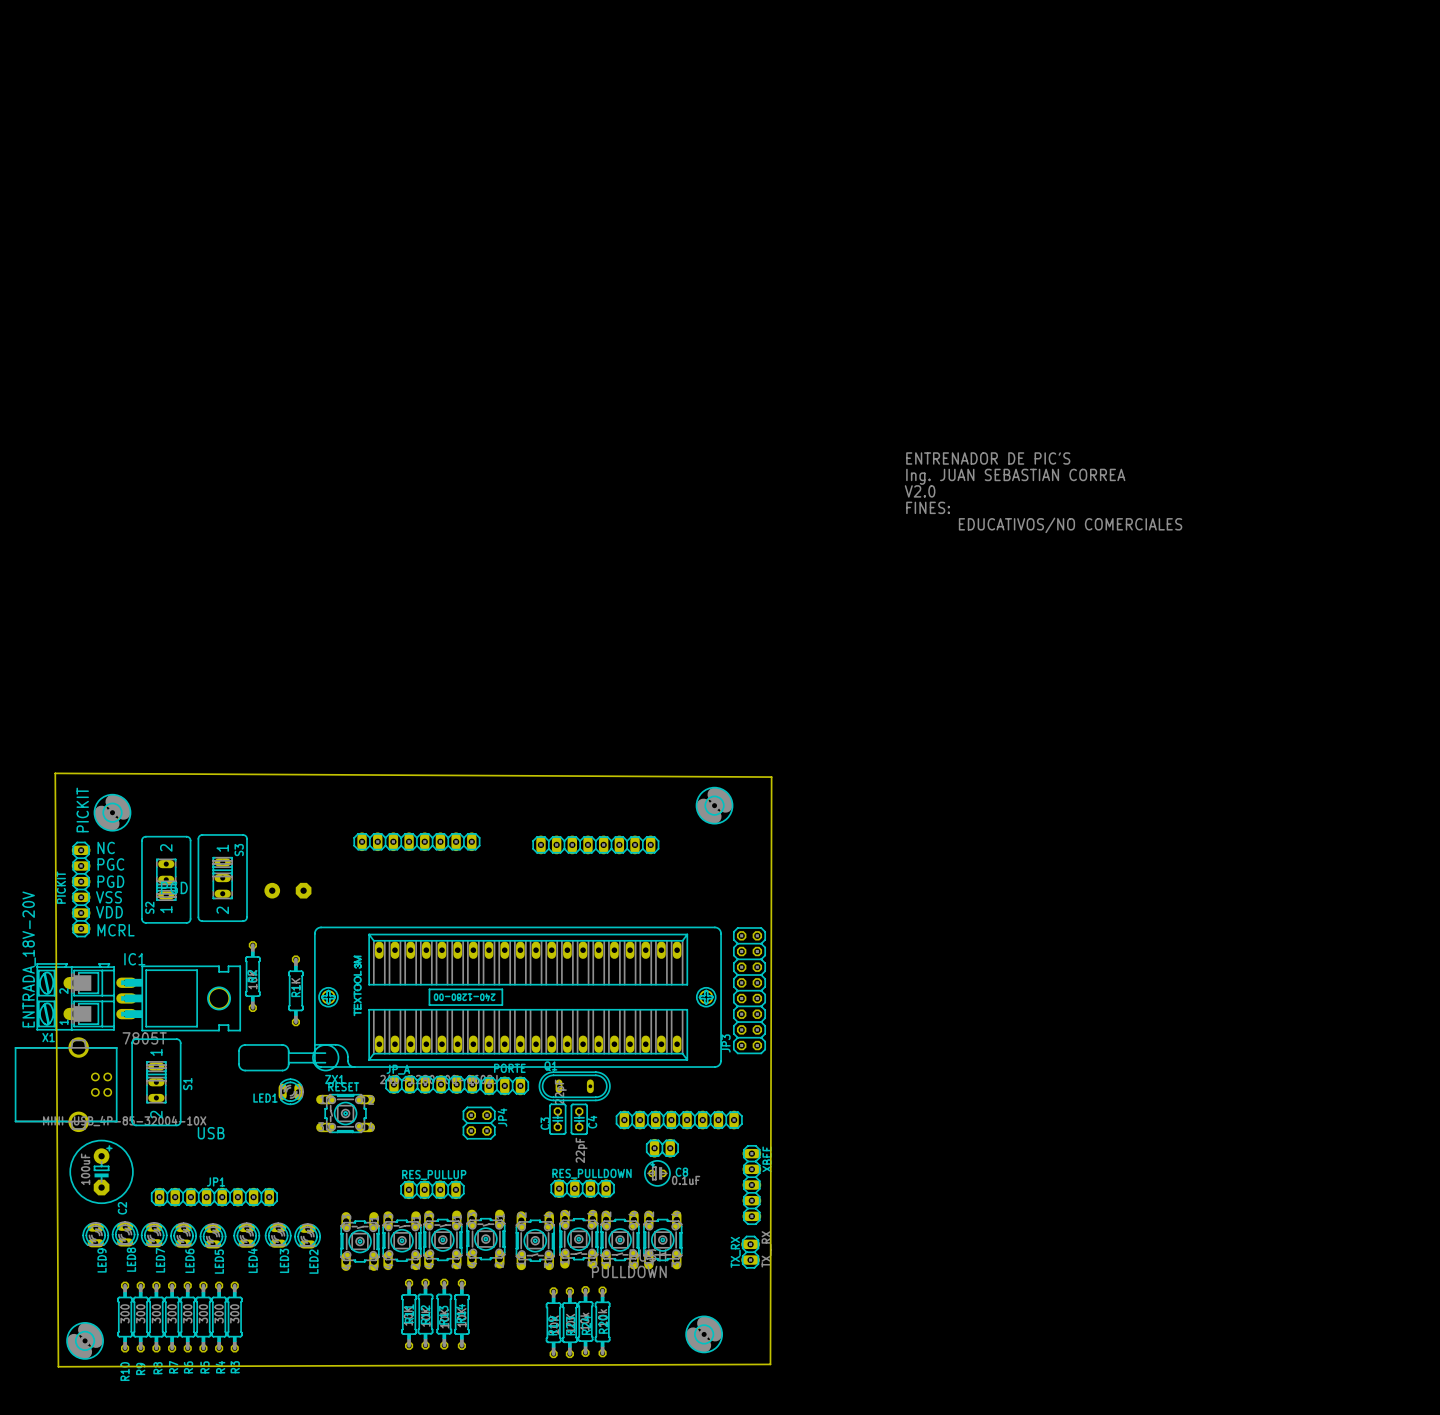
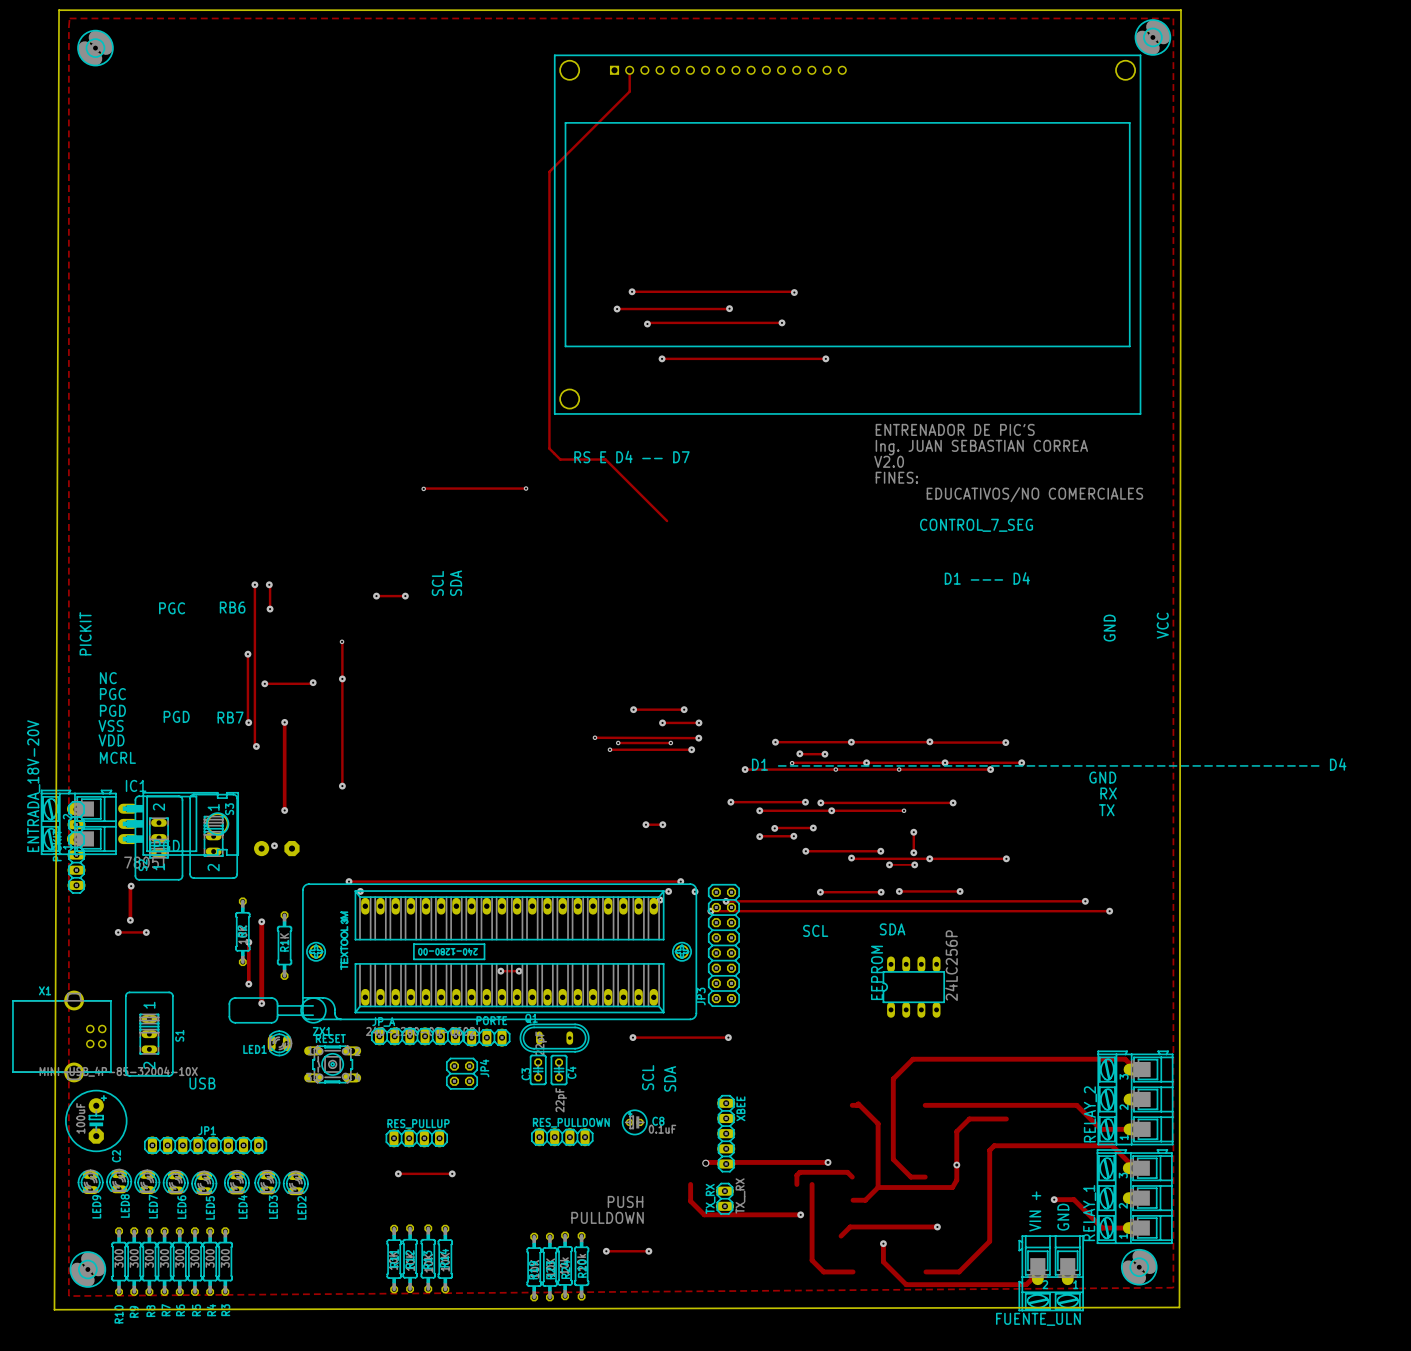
board edge: none -> (59, 10) (1181, 10) (1179, 1307) (54, 1309) (59, 10)
zone outline: none -> (69, 18) (1173, 18) (1173, 1287) (68, 1296) (69, 18)
part: none -> (1152, 37)
part: none -> (95, 48)
track: none -> (629, 70) (629, 91) (549, 171) (549, 448) (560, 459) (605, 459) (667, 521)
part: none -> (847, 234)
track: none -> (632, 291) (794, 292)
via: none -> (632, 291)
via: none -> (794, 292)
via: none -> (617, 309)
track: none -> (729, 308) (617, 309)
via: none -> (729, 308)
track: none -> (782, 322) (647, 324)
via: none -> (782, 322)
via: none -> (647, 324)
track: none -> (662, 358) (825, 358)
via: none -> (662, 358)
via: none -> (825, 358)
text: none -> RS E D4 -- D7 (631, 456)
via: none -> (423, 488)
track: none -> (526, 488) (423, 488)
via: none -> (526, 488)
text: none -> CONTROL_7_SEG (976, 525)
text: none -> D1 --- D4 (987, 578)
text: none -> SCL (437, 583)
text: none -> SDA (456, 583)
track: none -> (254, 584) (254, 744) (256, 746)
via: none -> (254, 584)
track: none -> (269, 584) (270, 609)
via: none -> (269, 584)
track: none -> (376, 596) (405, 596)
via: none -> (376, 596)
via: none -> (405, 596)
text: none -> RB6 (232, 607)
text: none -> PGC (172, 608)
via: none -> (270, 609)
text: none -> VCC (1162, 625)
text: none -> GND (1109, 628)
track: none -> (342, 641) (342, 786)
via: none -> (342, 641)
track: none -> (247, 654) (248, 722)
via: none -> (247, 654)
via: none -> (342, 678)
track: none -> (313, 682) (264, 683)
via: none -> (313, 682)
via: none -> (264, 683)
text: none -> PGC (112, 694)
track: none -> (633, 709) (684, 709)
via: none -> (633, 709)
via: none -> (684, 709)
text: none -> PGD (112, 710)
text: none -> PGD (176, 716)
text: none -> RB7 (230, 717)
via: none -> (248, 722)
track: none -> (284, 722) (284, 810)
via: none -> (284, 722)
track: none -> (662, 722) (698, 722)
via: none -> (662, 722)
via: none -> (698, 722)
board edge: (55, 773) (771, 777) (770, 1364) (58, 1366) (55, 773) -> none
track: none -> (594, 737) (698, 738)
via: none -> (594, 737)
via: none -> (698, 738)
via: none -> (775, 742)
via: none -> (851, 742)
track: none -> (929, 741) (1005, 742)
track: none -> (929, 741) (775, 742)
via: none -> (929, 741)
track: none -> (618, 743) (670, 743)
via: none -> (618, 743)
via: none -> (670, 743)
via: none -> (1005, 742)
via: none -> (256, 746)
track: none -> (609, 749) (691, 749)
via: none -> (609, 749)
via: none -> (691, 749)
track: none -> (799, 753) (824, 754)
via: none -> (799, 753)
via: none -> (824, 754)
via: none -> (792, 763)
via: none -> (866, 762)
via: none -> (945, 762)
track: none -> (1021, 762) (792, 763)
via: none -> (1021, 762)
text: none -> D1 ---------------------------------------------- D4 (1049, 764)
part: (714, 805) -> none
text position: PICKIT (82, 809) -> PICKIT (85, 633)
track: none -> (745, 769) (990, 769)
via: none -> (745, 769)
via: none -> (835, 769)
via: none -> (899, 769)
via: none -> (990, 769)
part: (112, 812) -> none
text: none -> GND (1102, 777)
via: none -> (342, 786)
text: none -> RX (1108, 793)
part: (416, 841) -> none
track: none -> (730, 802) (805, 802)
via: none -> (730, 802)
via: none -> (805, 802)
track: none -> (820, 802) (953, 802)
via: none -> (820, 802)
via: none -> (953, 802)
part: (595, 844) -> none
text position: NC (106, 847) -> NC (108, 678)
via: none -> (284, 810)
track: none -> (759, 810) (904, 810)
via: none -> (759, 810)
via: none -> (831, 810)
via: none -> (904, 810)
text: none -> TX (1106, 810)
text: PGC (110, 864) -> none
track: none -> (645, 824) (662, 824)
via: none -> (645, 824)
via: none -> (662, 824)
via: none -> (774, 828)
track: none -> (813, 828) (774, 828)
via: none -> (813, 828)
track: none -> (913, 832) (913, 852)
via: none -> (913, 832)
track: none -> (793, 836) (759, 836)
via: none -> (793, 836)
via: none -> (759, 836)
text: PGD (110, 881) -> none
via: none -> (274, 845)
track: none -> (805, 851) (880, 851)
via: none -> (805, 851)
via: none -> (880, 851)
via: none -> (913, 852)
text position: VSS (108, 897) -> VSS (111, 725)
track: none -> (851, 857) (852, 858) (1006, 858)
via: none -> (851, 858)
via: none -> (929, 858)
via: none -> (1006, 858)
track: none -> (889, 864) (915, 864)
via: none -> (889, 864)
via: none -> (914, 864)
text position: VDD (109, 912) -> VDD (111, 740)
track: none -> (349, 881) (680, 881)
via: none -> (349, 881)
via: none -> (680, 881)
track: none -> (131, 886) (130, 920)
via: none -> (131, 886)
text position: MCRL (116, 930) -> MCRL (117, 757)
via: none -> (360, 891)
via: none -> (668, 891)
track: none -> (899, 891) (960, 891)
via: none -> (899, 891)
via: none -> (960, 891)
via: none -> (695, 891)
track: none -> (820, 892) (881, 892)
via: none -> (820, 892)
via: none -> (881, 892)
via: none -> (660, 900)
track: none -> (726, 901) (1085, 901)
via: none -> (726, 901)
via: none -> (1085, 901)
track: none -> (710, 911) (1109, 911)
via: none -> (710, 911)
via: none -> (1109, 911)
via: none -> (130, 920)
track: none -> (261, 921) (261, 1003)
via: none -> (261, 921)
text: none -> SDA (892, 929)
text: none -> SCL (815, 930)
track: none -> (118, 932) (146, 932)
via: none -> (118, 932)
via: none -> (146, 932)
track: none -> (248, 942) (248, 984)
via: none -> (248, 942)
ENTRADA_18V-20V position: (75, 996) -> (78, 822)
IC1 position: (178, 998) -> (178, 823)
track: none -> (500, 971) (519, 971)
via: none -> (500, 971)
via: none -> (519, 971)
via: none -> (248, 984)
EEPROM: none -> 24LC256P (913, 987)
via: none -> (261, 1003)
track: none -> (632, 1037) (728, 1037)
via: none -> (632, 1037)
via: none -> (728, 1037)
track: none -> (1135, 1069) (1125, 1059) (913, 1059) (893, 1078) (893, 1159) (910, 1177) (925, 1177)
part: (679, 1120) -> none
text: none -> SCL (648, 1077)
text: none -> SDA (670, 1078)
part: (662, 1148) -> none
RELAY_2: none -> (1135, 1097)
track: none -> (852, 1105) (858, 1104) (878, 1123) (878, 1187)
track: none -> (925, 1105) (1076, 1105) (1100, 1129) (1135, 1129)
track: none -> (1006, 1118) (969, 1118) (956, 1131) (956, 1180) (952, 1187) (878, 1187)
track: none -> (828, 1162) (705, 1163)
via: none -> (828, 1162)
via: none -> (705, 1163)
via: none -> (956, 1165)
track: none -> (1134, 1168) (1112, 1145) (994, 1145) (989, 1150) (989, 1241) (959, 1271) (925, 1271)
track: none -> (398, 1173) (452, 1173)
via: none -> (398, 1173)
via: none -> (452, 1173)
track: none -> (852, 1177) (847, 1172) (799, 1172) (796, 1175) (796, 1184)
track: none -> (690, 1184) (690, 1201) (704, 1214) (800, 1214)
track: none -> (812, 1184) (812, 1260) (823, 1271) (853, 1271)
part: (442, 1239) -> none
part: (485, 1239) -> none
part: (578, 1239) -> none
part: (620, 1239) -> none
part: (662, 1239) -> none
part: (402, 1240) -> none
part: (535, 1240) -> none
track: none -> (878, 1187) (865, 1200) (853, 1200)
part: (360, 1241) -> none
RELAY_1: none -> (1134, 1196)
track: none -> (1054, 1199) (1073, 1199) (1102, 1228) (1134, 1228)
via: none -> (1054, 1199)
text: none -> VIN + (1035, 1211)
via: none -> (800, 1214)
text: none -> GND (1063, 1217)
track: none -> (937, 1226) (850, 1226) (841, 1236)
via: none -> (937, 1226)
track: none -> (883, 1243) (883, 1261) (906, 1284) (1026, 1284) (1037, 1273)
via: none -> (883, 1243)
track: none -> (606, 1251) (648, 1251)
via: none -> (606, 1251)
via: none -> (648, 1251)
part: none -> (1139, 1267)
FUENTE_ULN: none -> (1051, 1273)
part: (704, 1334) -> none
part position: (85, 1340) -> (87, 1269)

